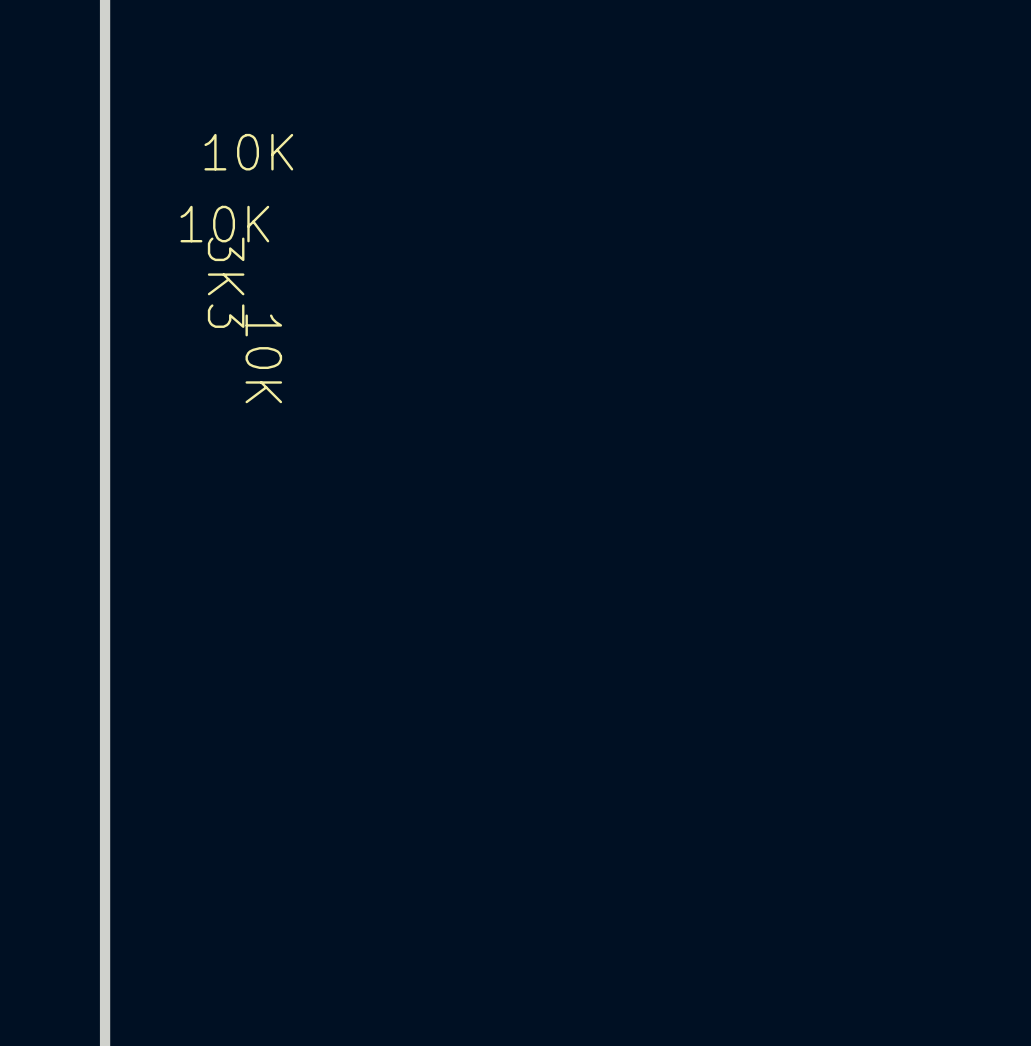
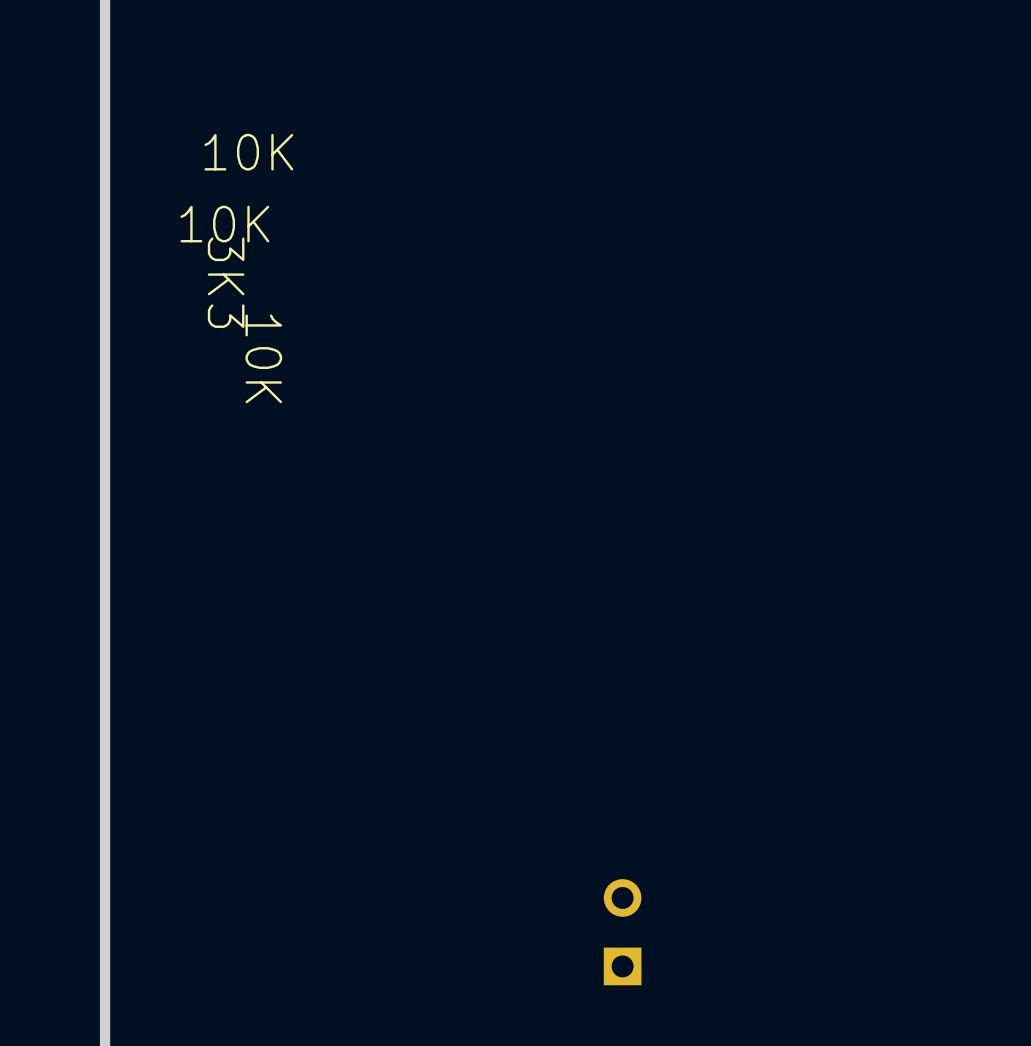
part: none -> (622, 932)

